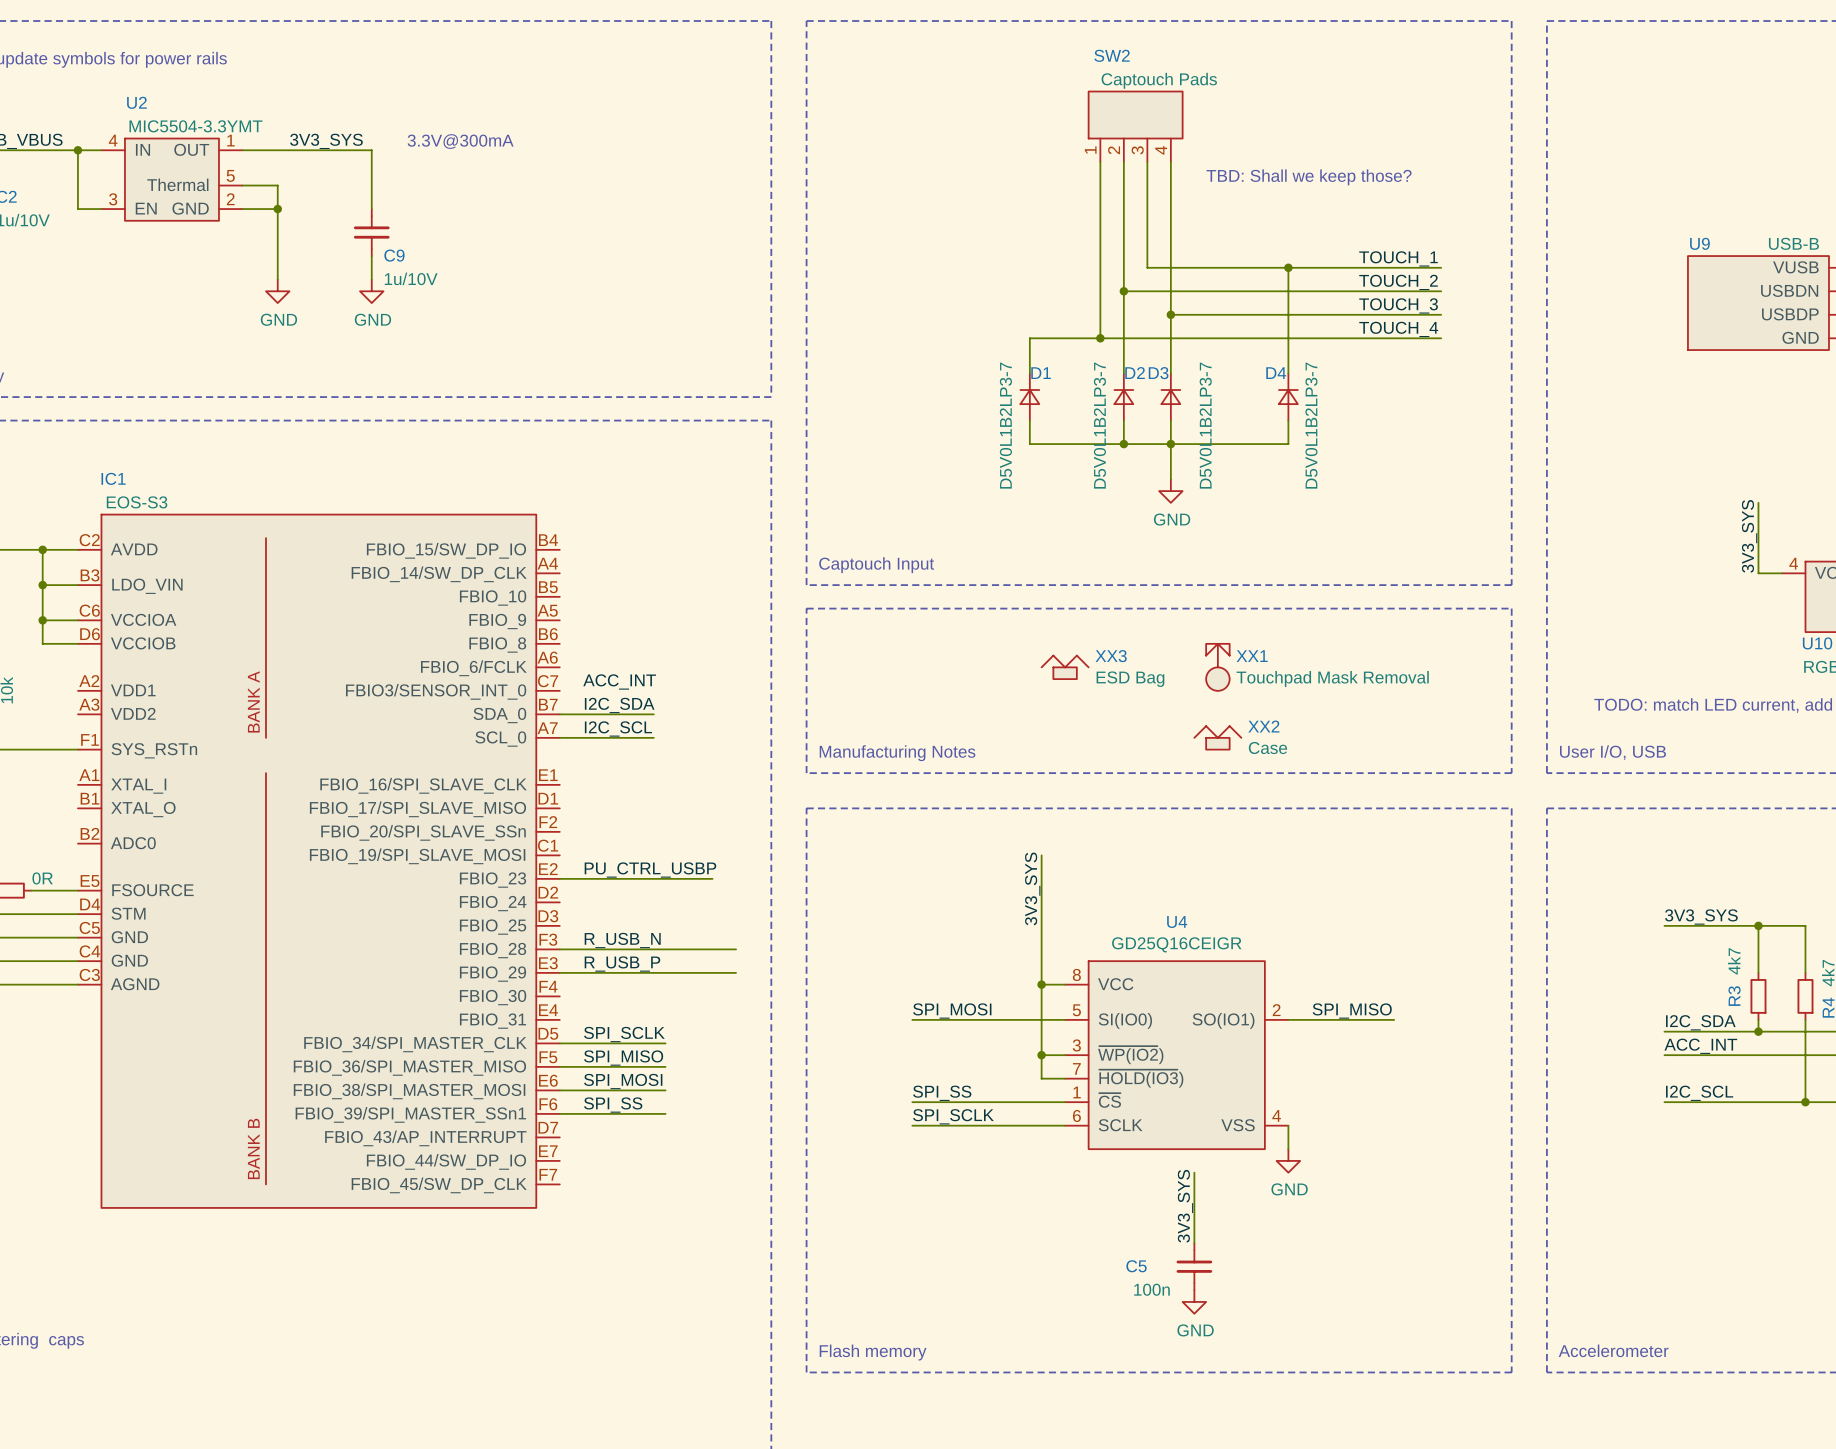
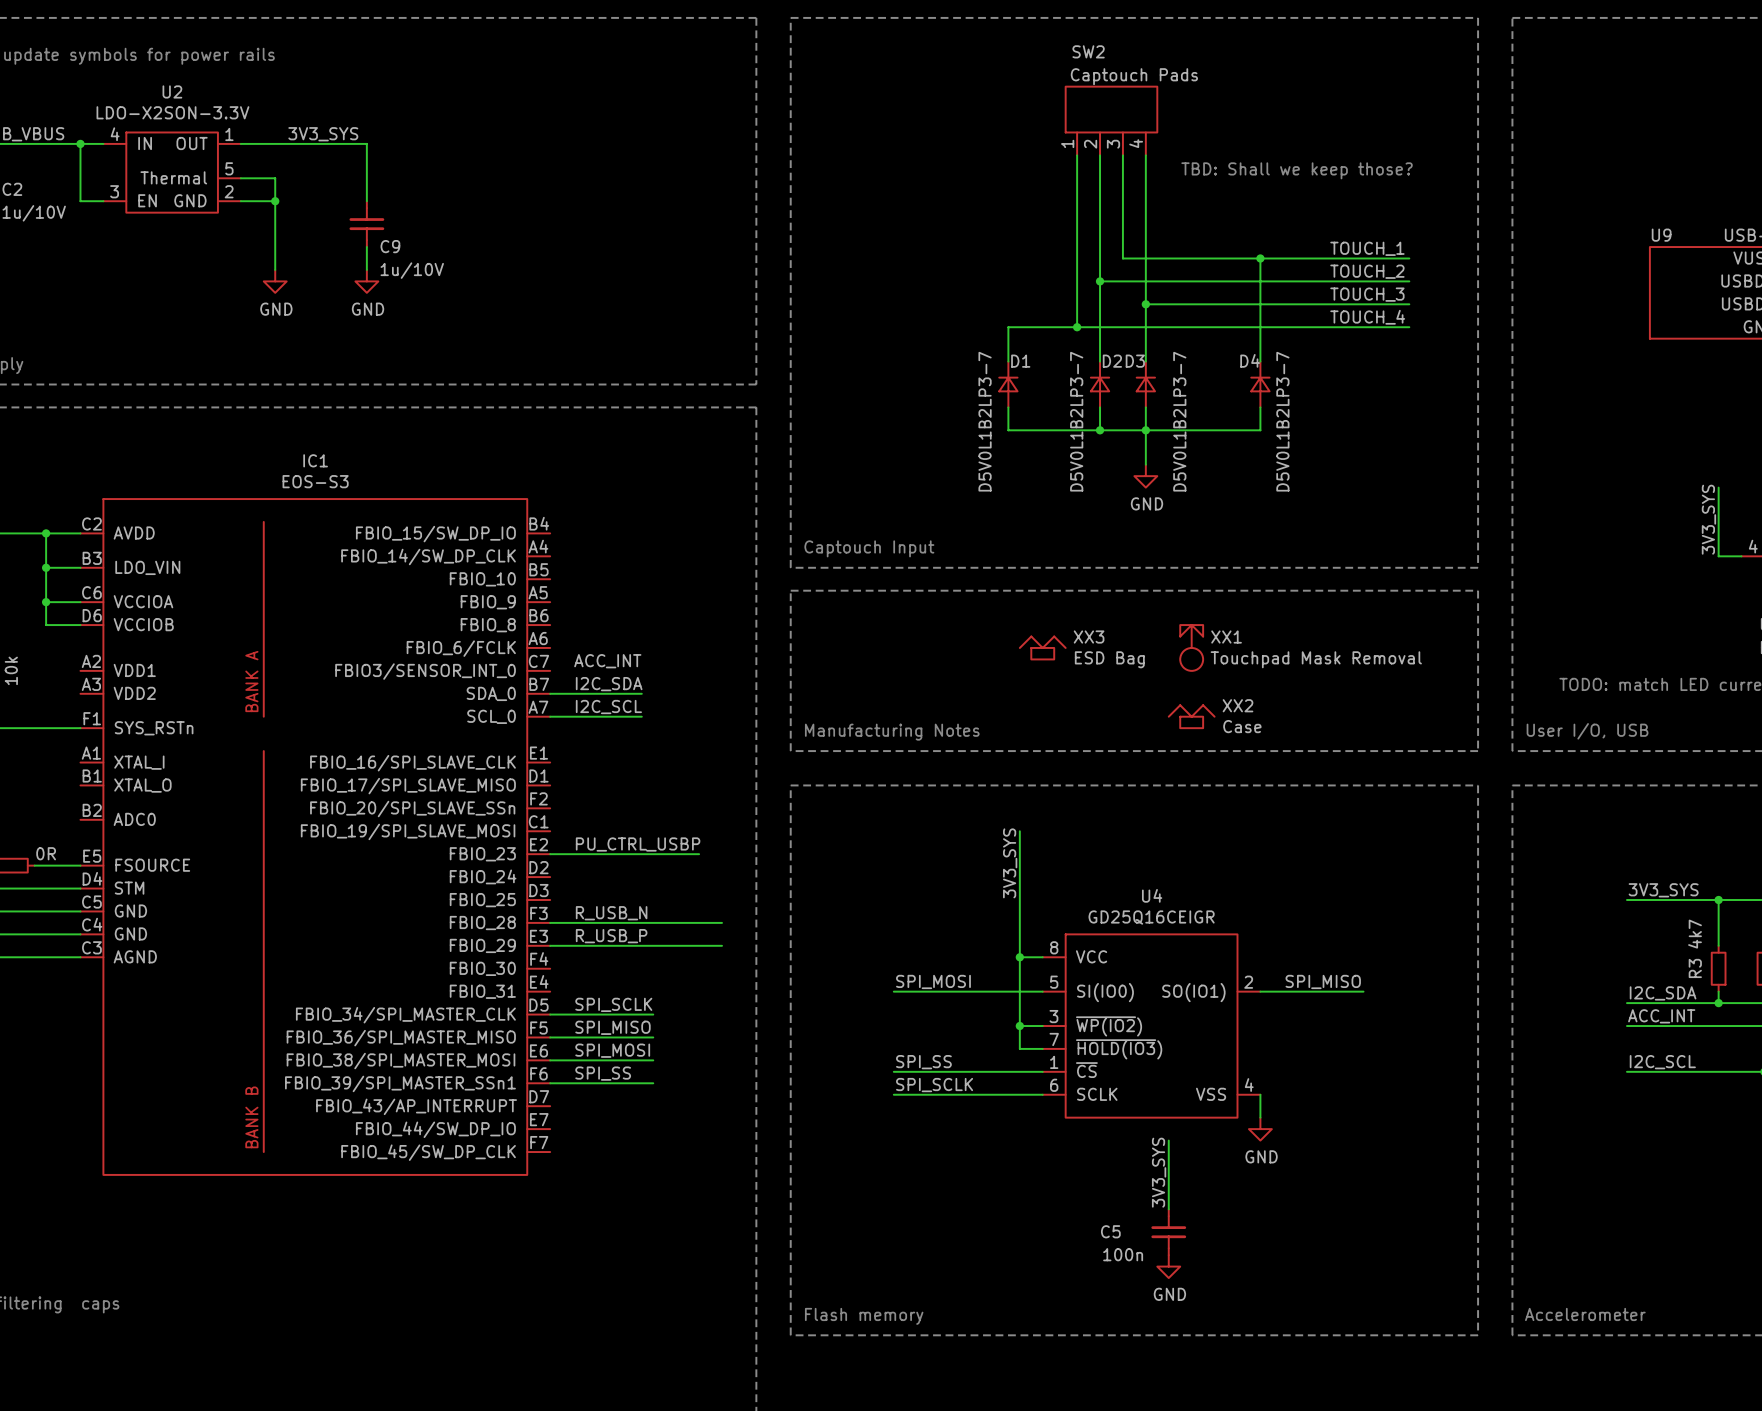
U2 name position: U2 (136, 102) -> U2 (172, 91)
U2 value: MIC5504-3.3YMT (195, 126) -> LDO-X2SON-3.3V (172, 112)
text: 3.3V@300mA (460, 141) -> none
IC1 name position: IC1 (113, 478) -> IC1 (315, 460)
IC1 value position: EOS-S3 (137, 502) -> EOS-S3 (315, 481)

